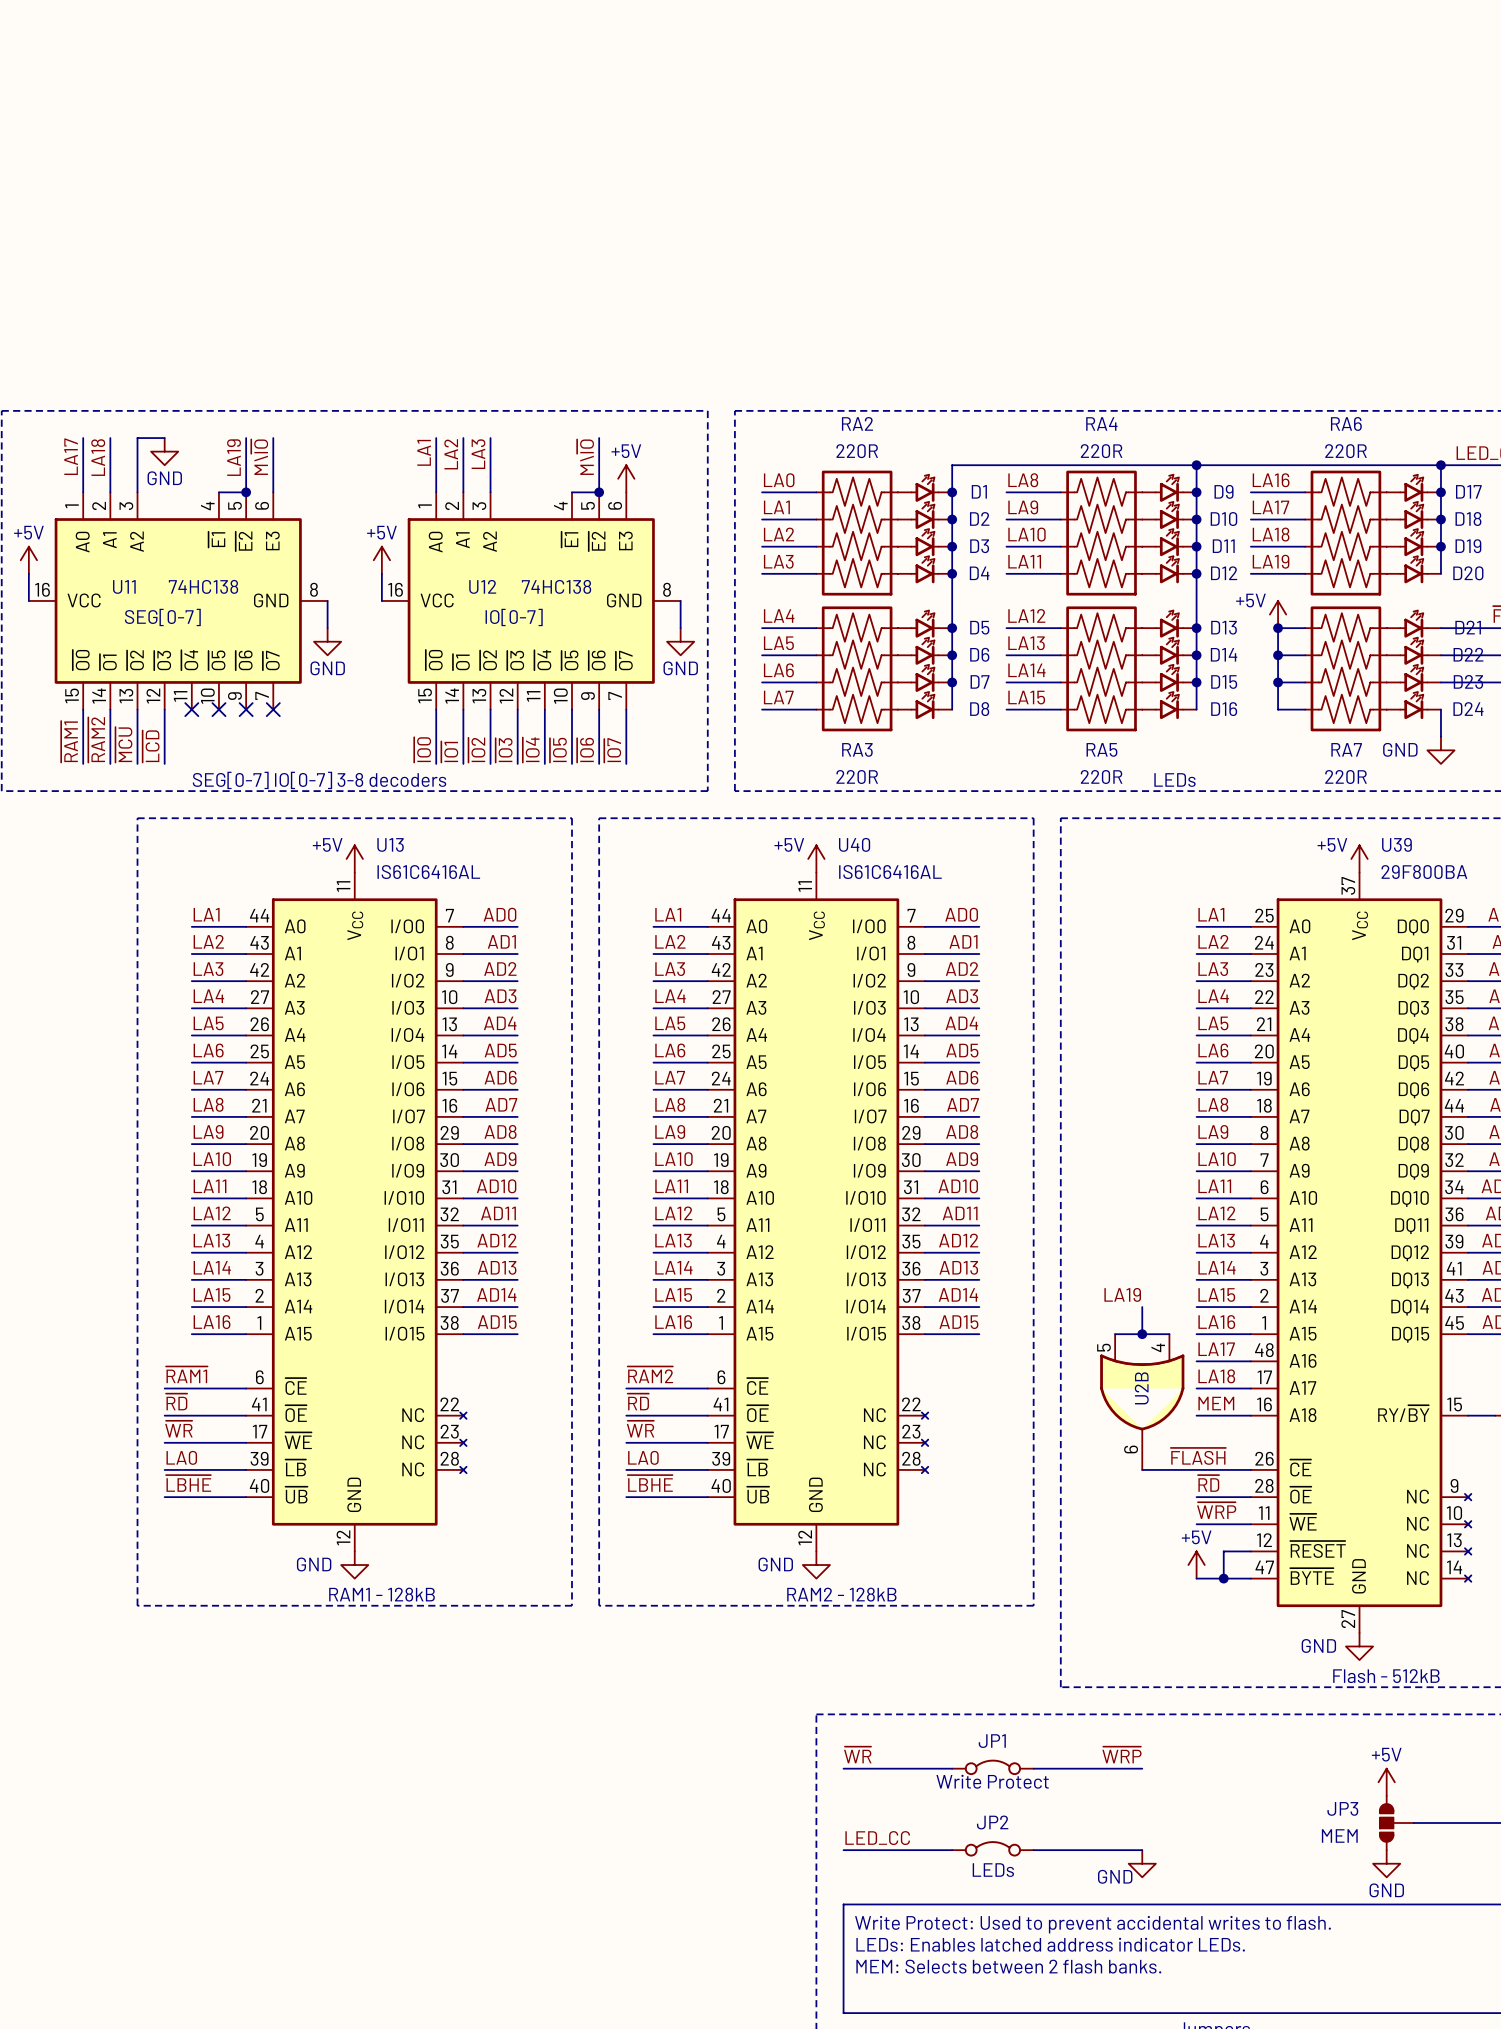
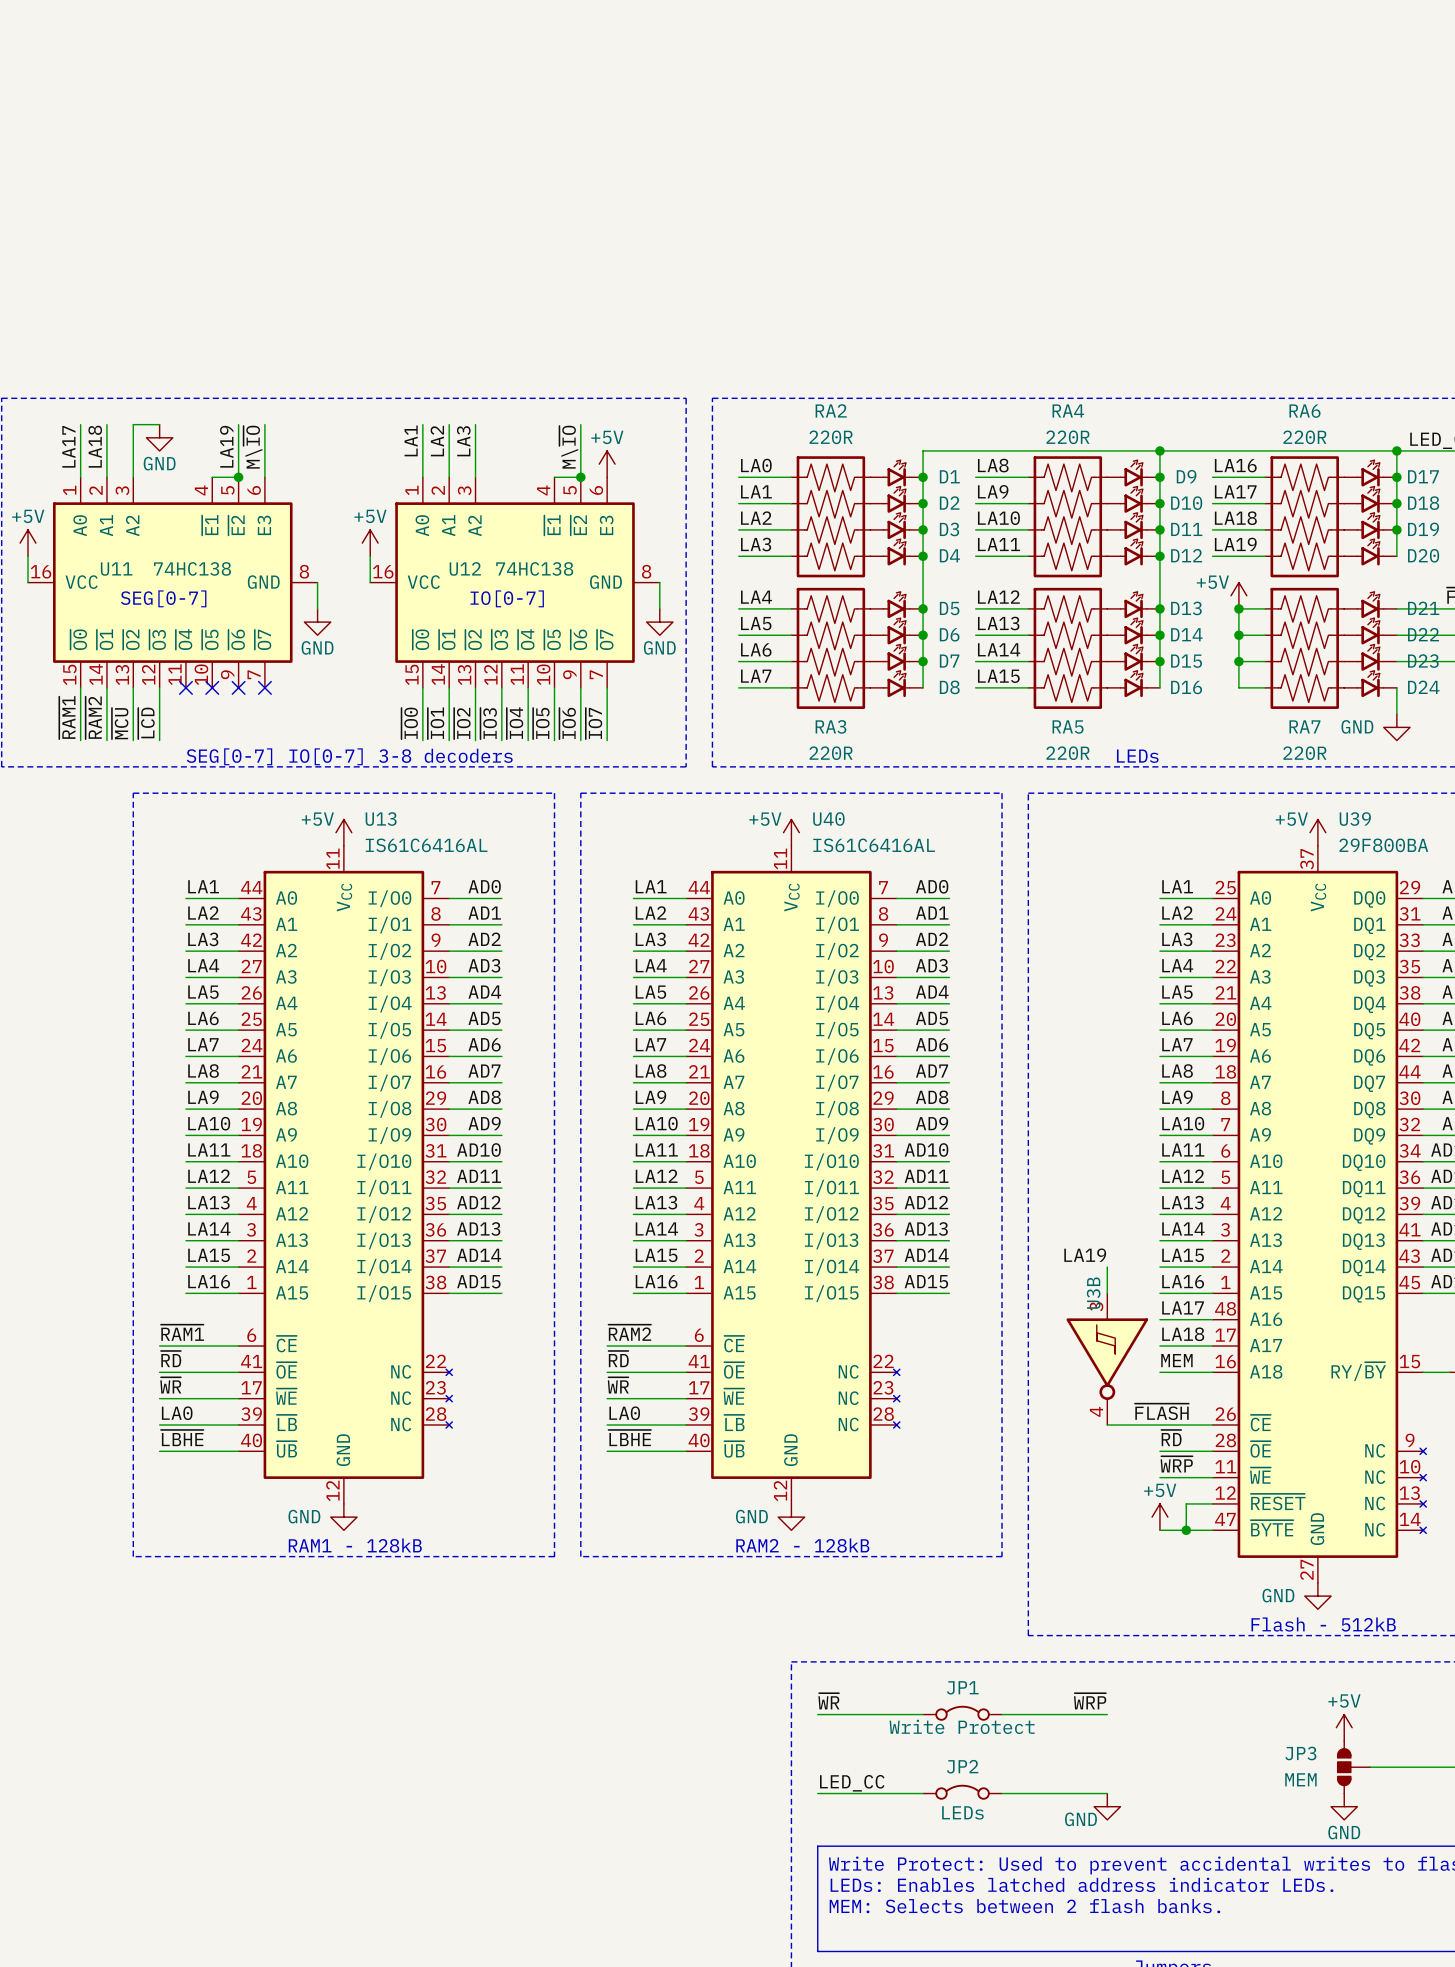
RA2 rotation: 0° (857, 533) -> 180° (830, 516)
RA4 rotation: 0° (1101, 533) -> 180° (1067, 516)
RA6 rotation: 0° (1345, 533) -> 180° (1304, 516)
RA3 rotation: 0° (857, 668) -> 180° (830, 648)
RA5 rotation: 0° (1101, 668) -> 180° (1067, 648)
RA7 rotation: 0° (1345, 668) -> 180° (1304, 648)
wire: (1115, 1334) (1169, 1334) -> none
junction: (1142, 1334) -> none
U2B: (1142, 1402) -> none
U3B: none -> (1107, 1359)

